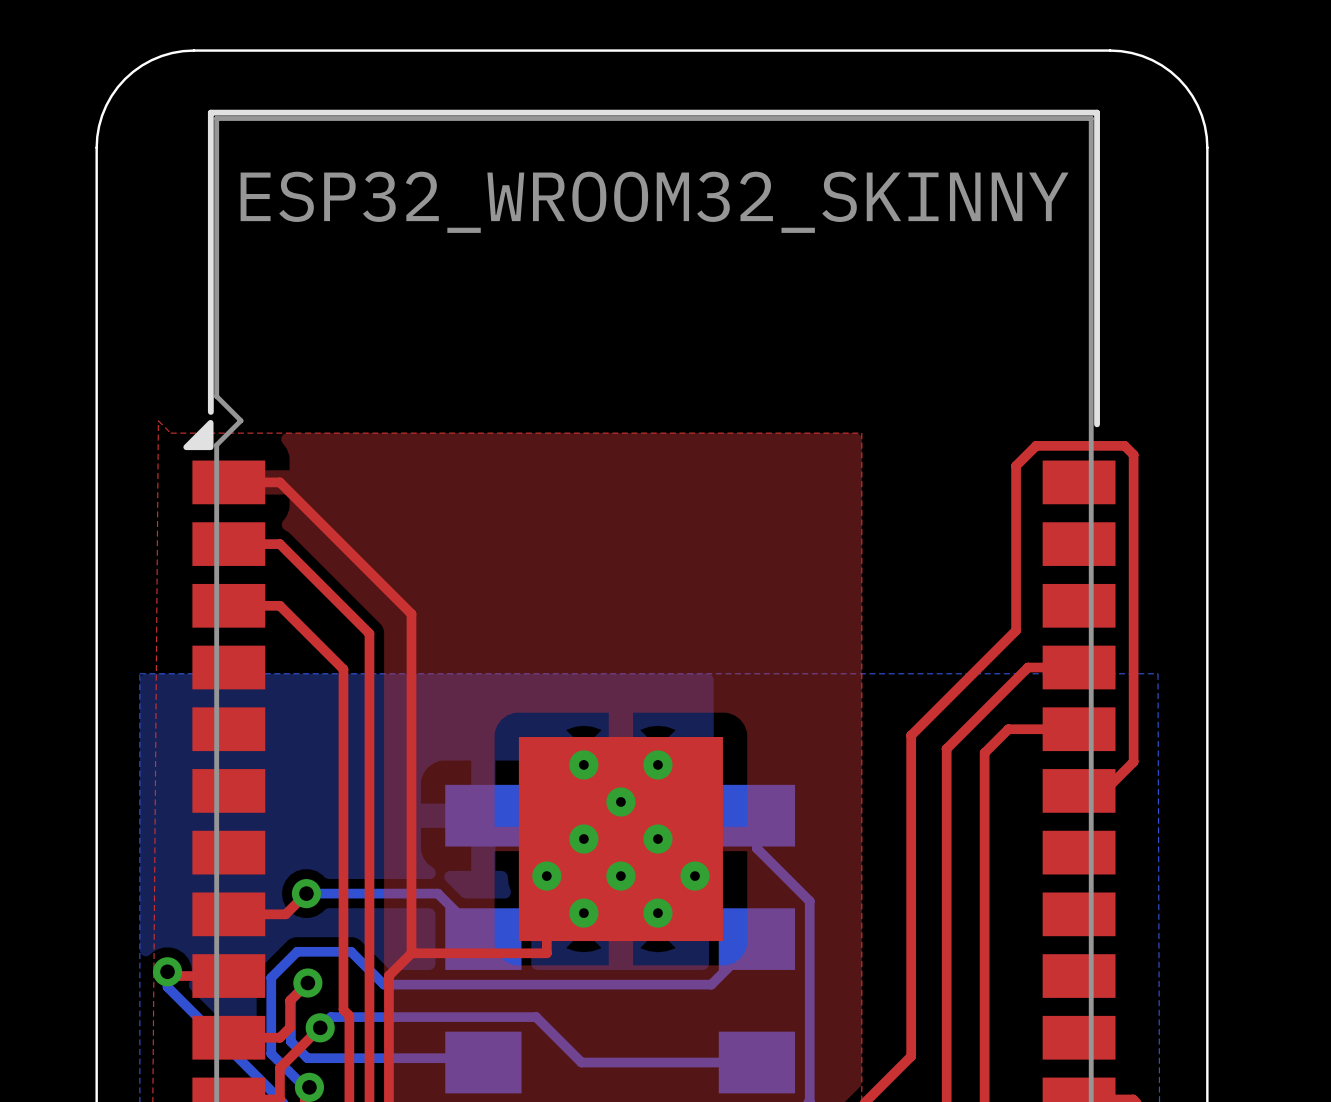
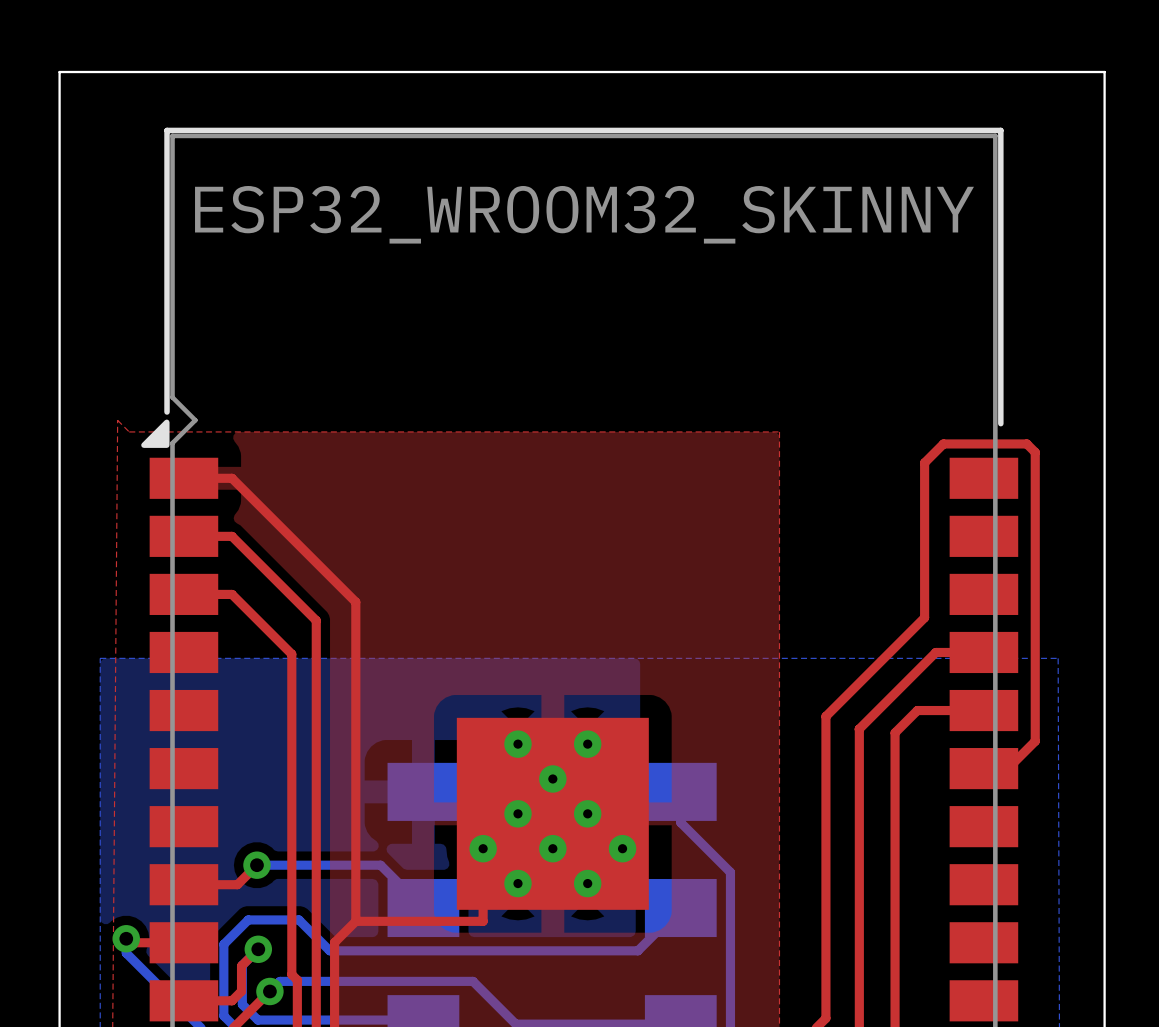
board edge: (193, 50) (161, 56) (142, 65) (125, 79) (106, 105) (99, 126) (96, 147) -> (151, 72) (59, 72) (59, 163)
board edge: (1110, 50) (1142, 56) (1161, 65) (1178, 79) (1197, 105) (1204, 126) (1207, 147) -> (1013, 72) (1104, 72) (1104, 163)

